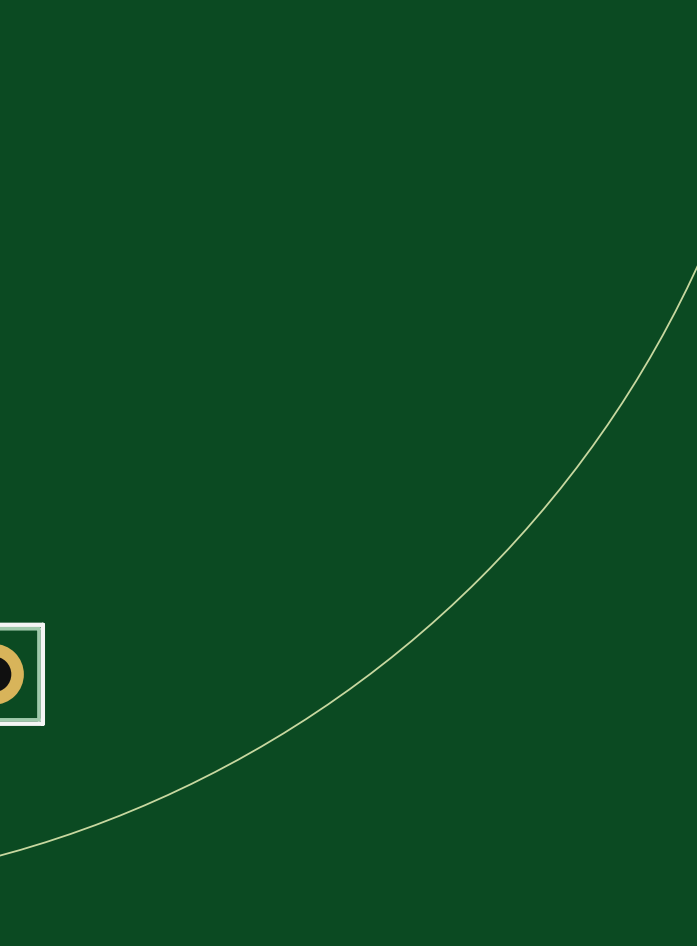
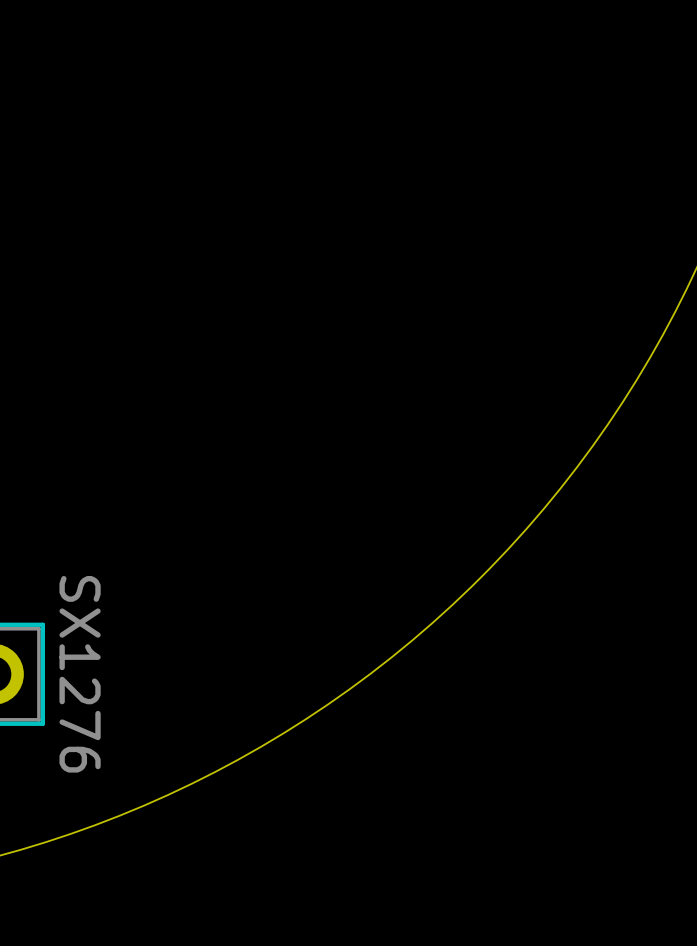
part value: none -> SX1276 (80, 674)

